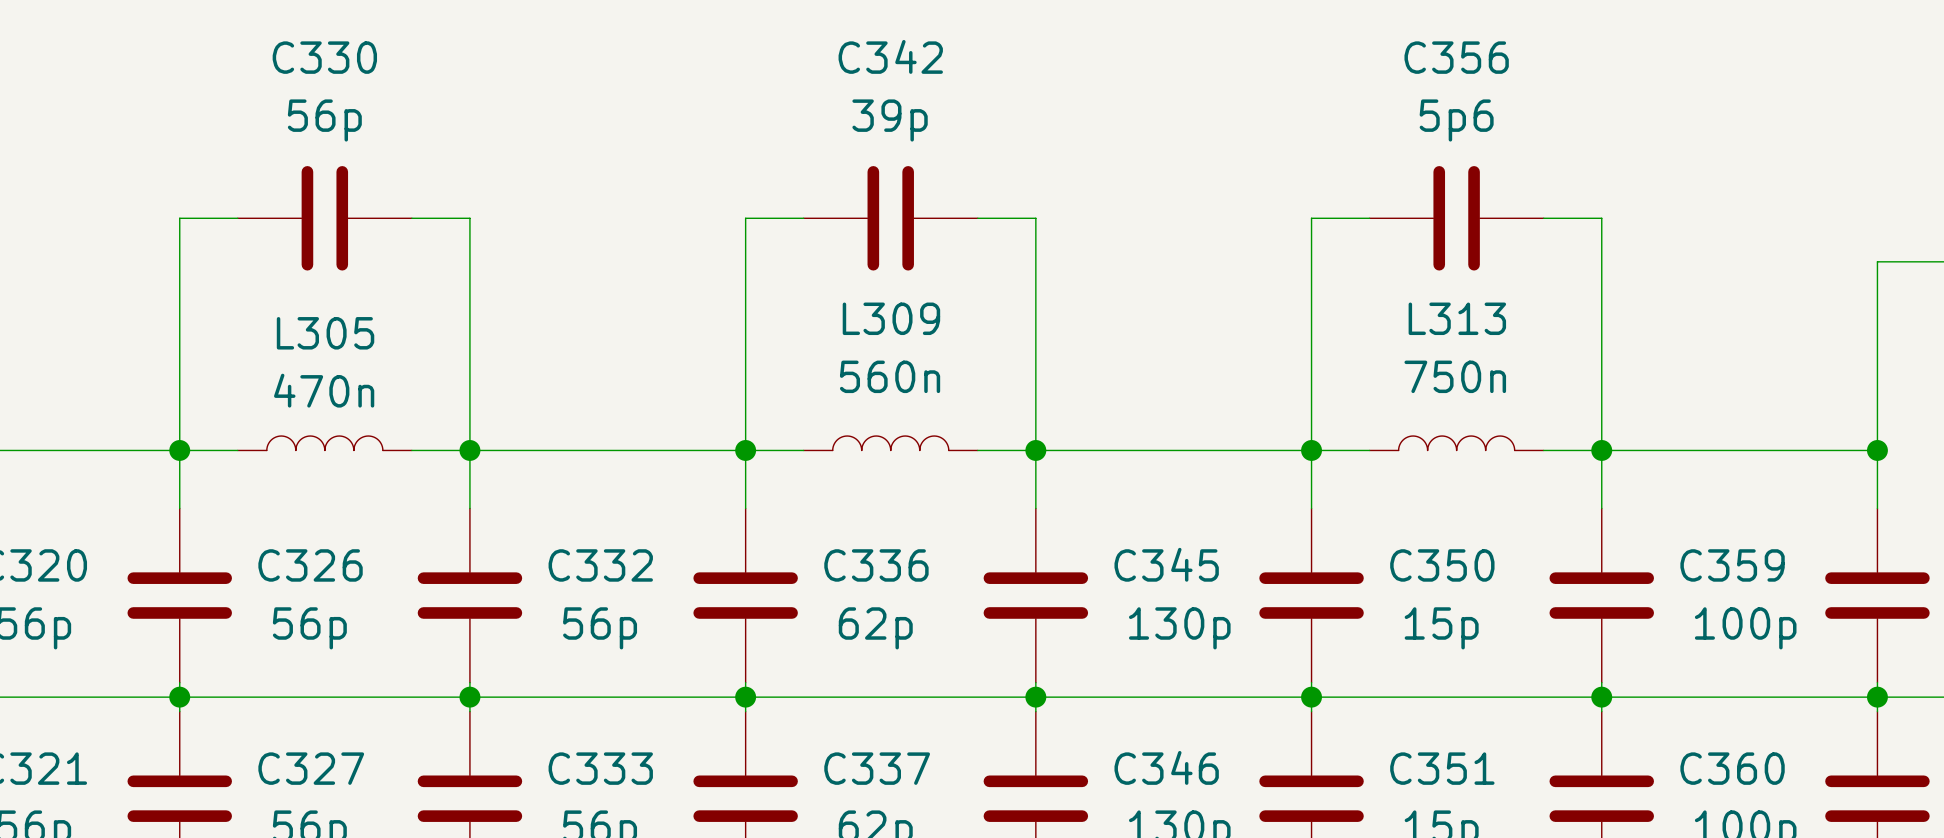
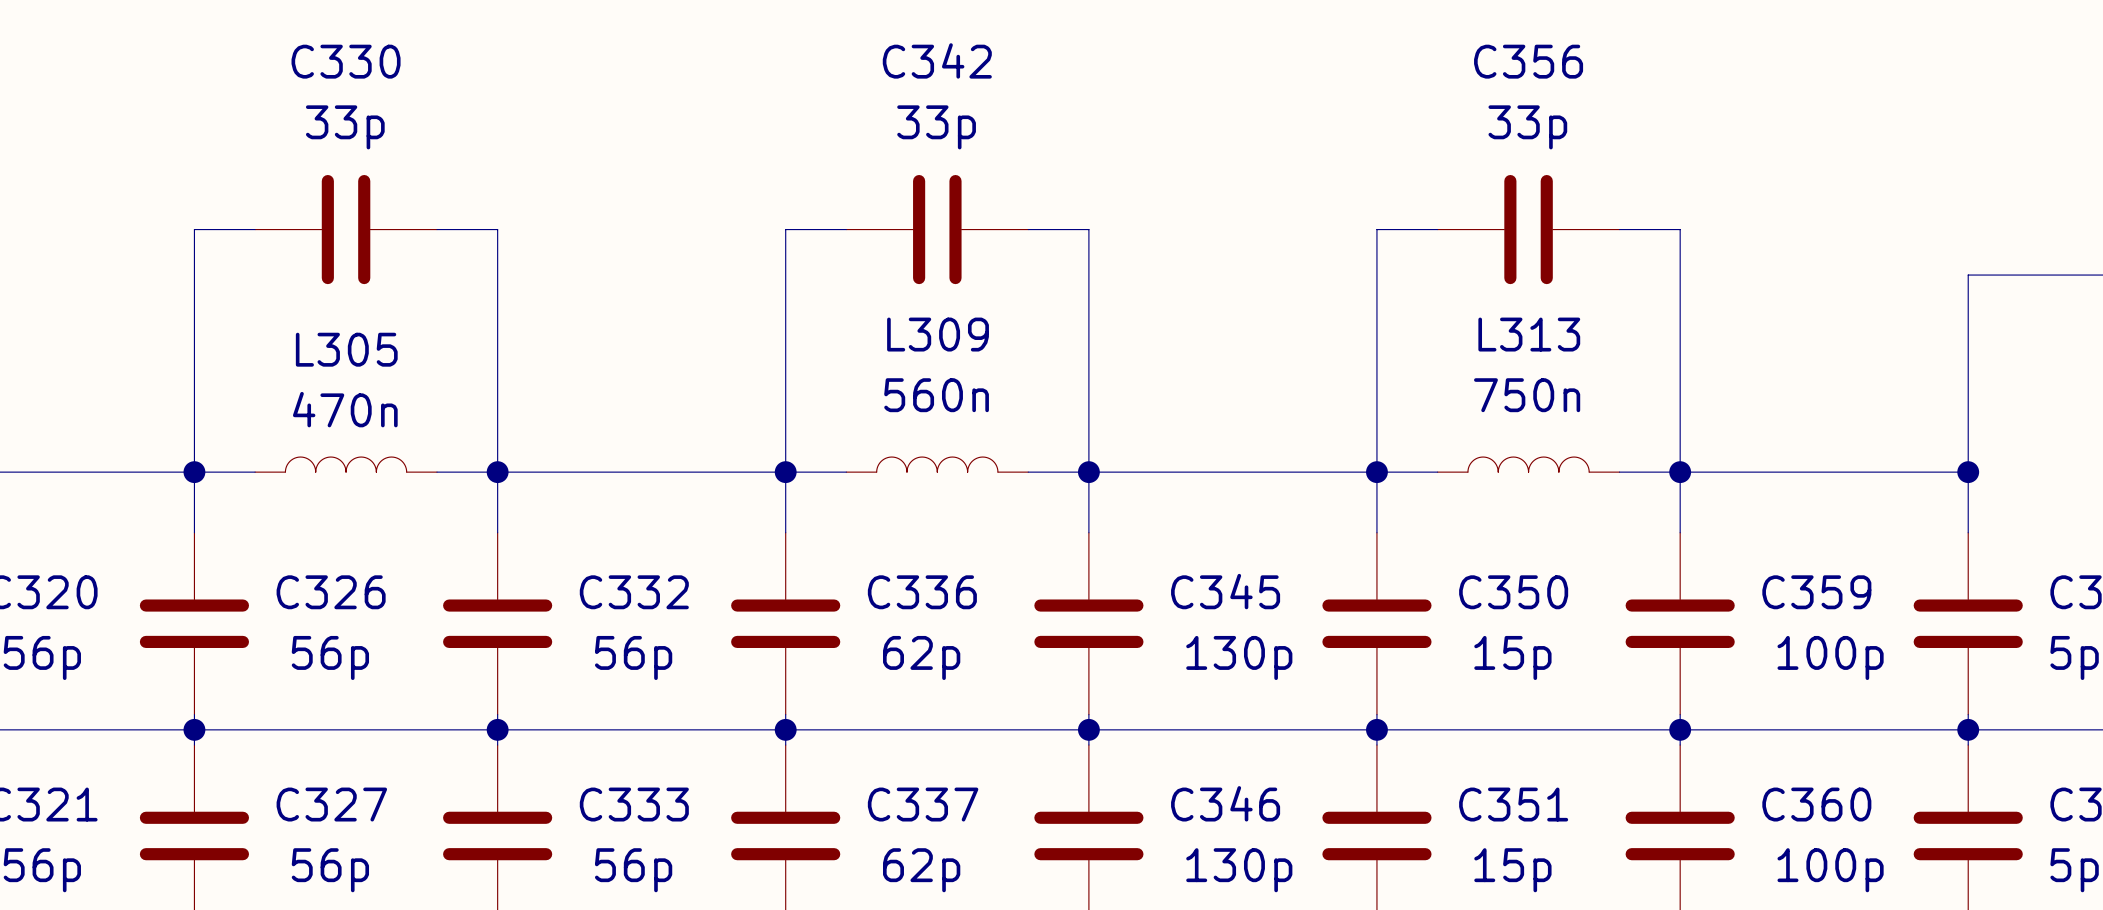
C330 value: 56p (324, 120) -> 33p (345, 127)
C342 value: 39p (890, 120) -> 33p (936, 127)
C356 value: 5p6 (1456, 120) -> 33p (1527, 127)

